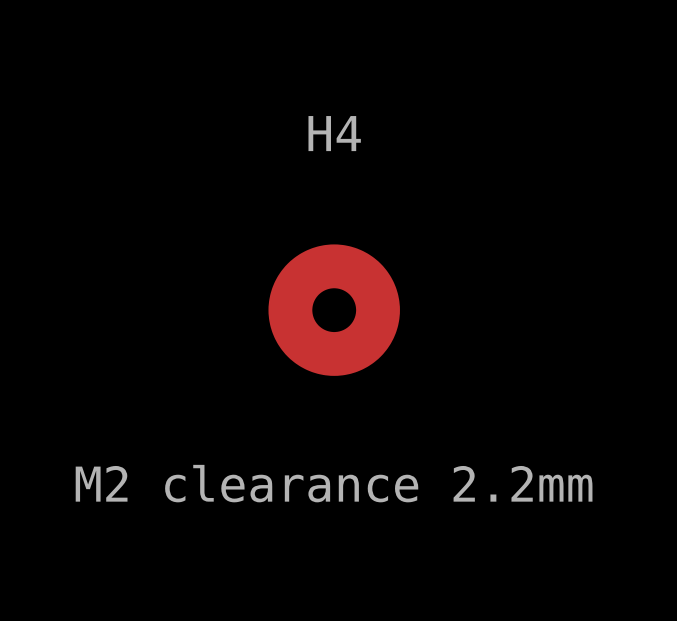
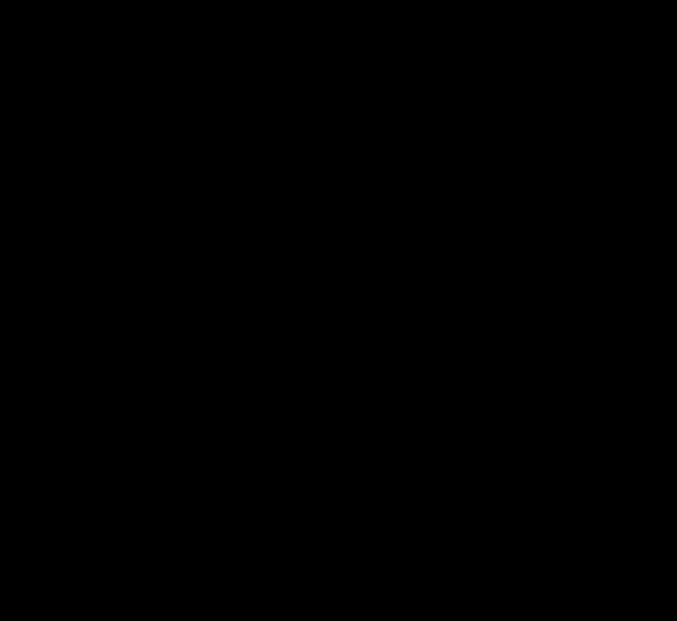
H4: M2 clearance 2.2mm (334, 310) -> none

